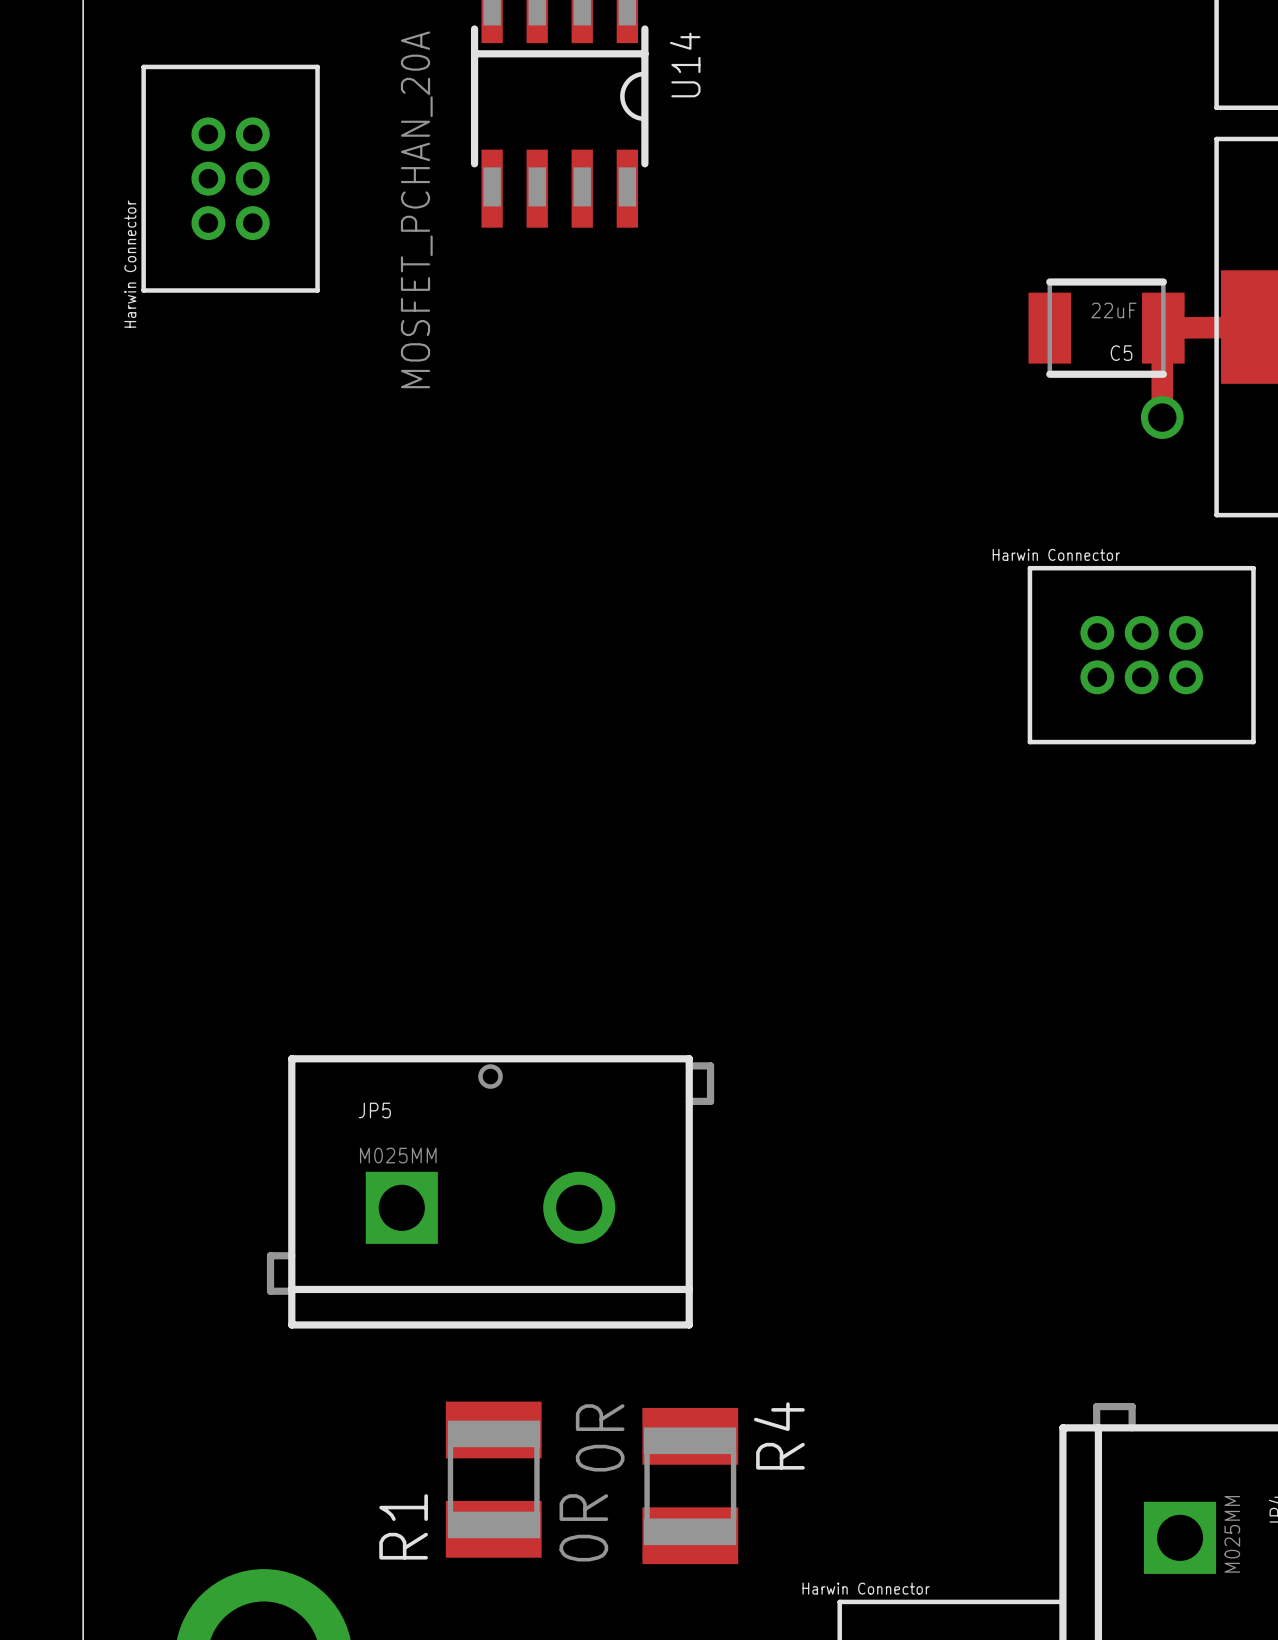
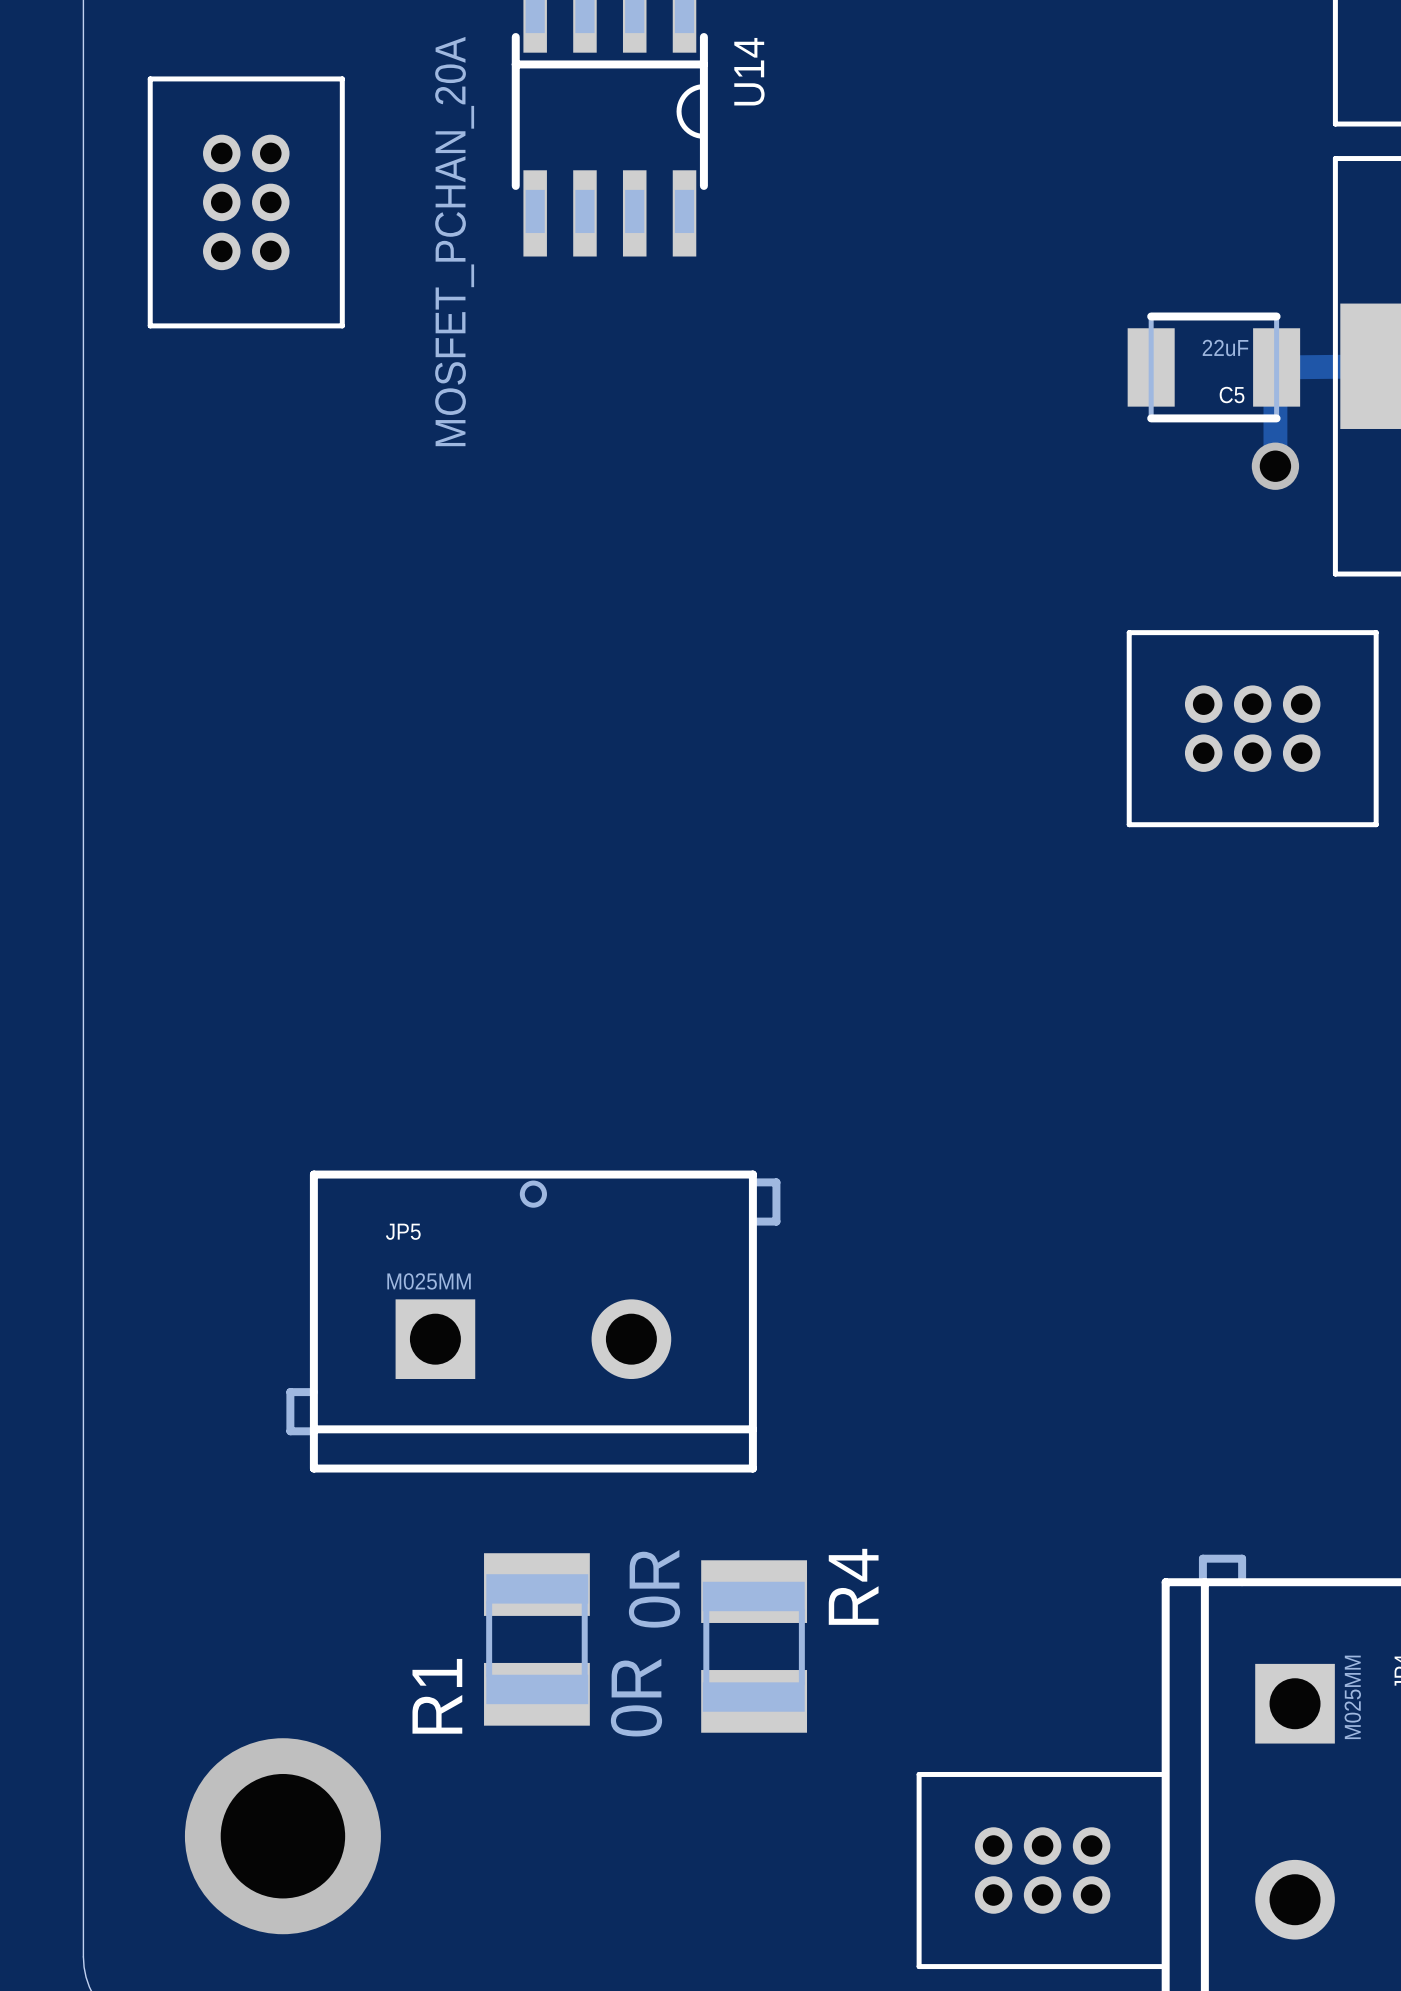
part text: Harwin Connector (130, 264) -> none
part text: Harwin Connector (1056, 554) -> none
part text: Harwin Connector (866, 1588) -> none

